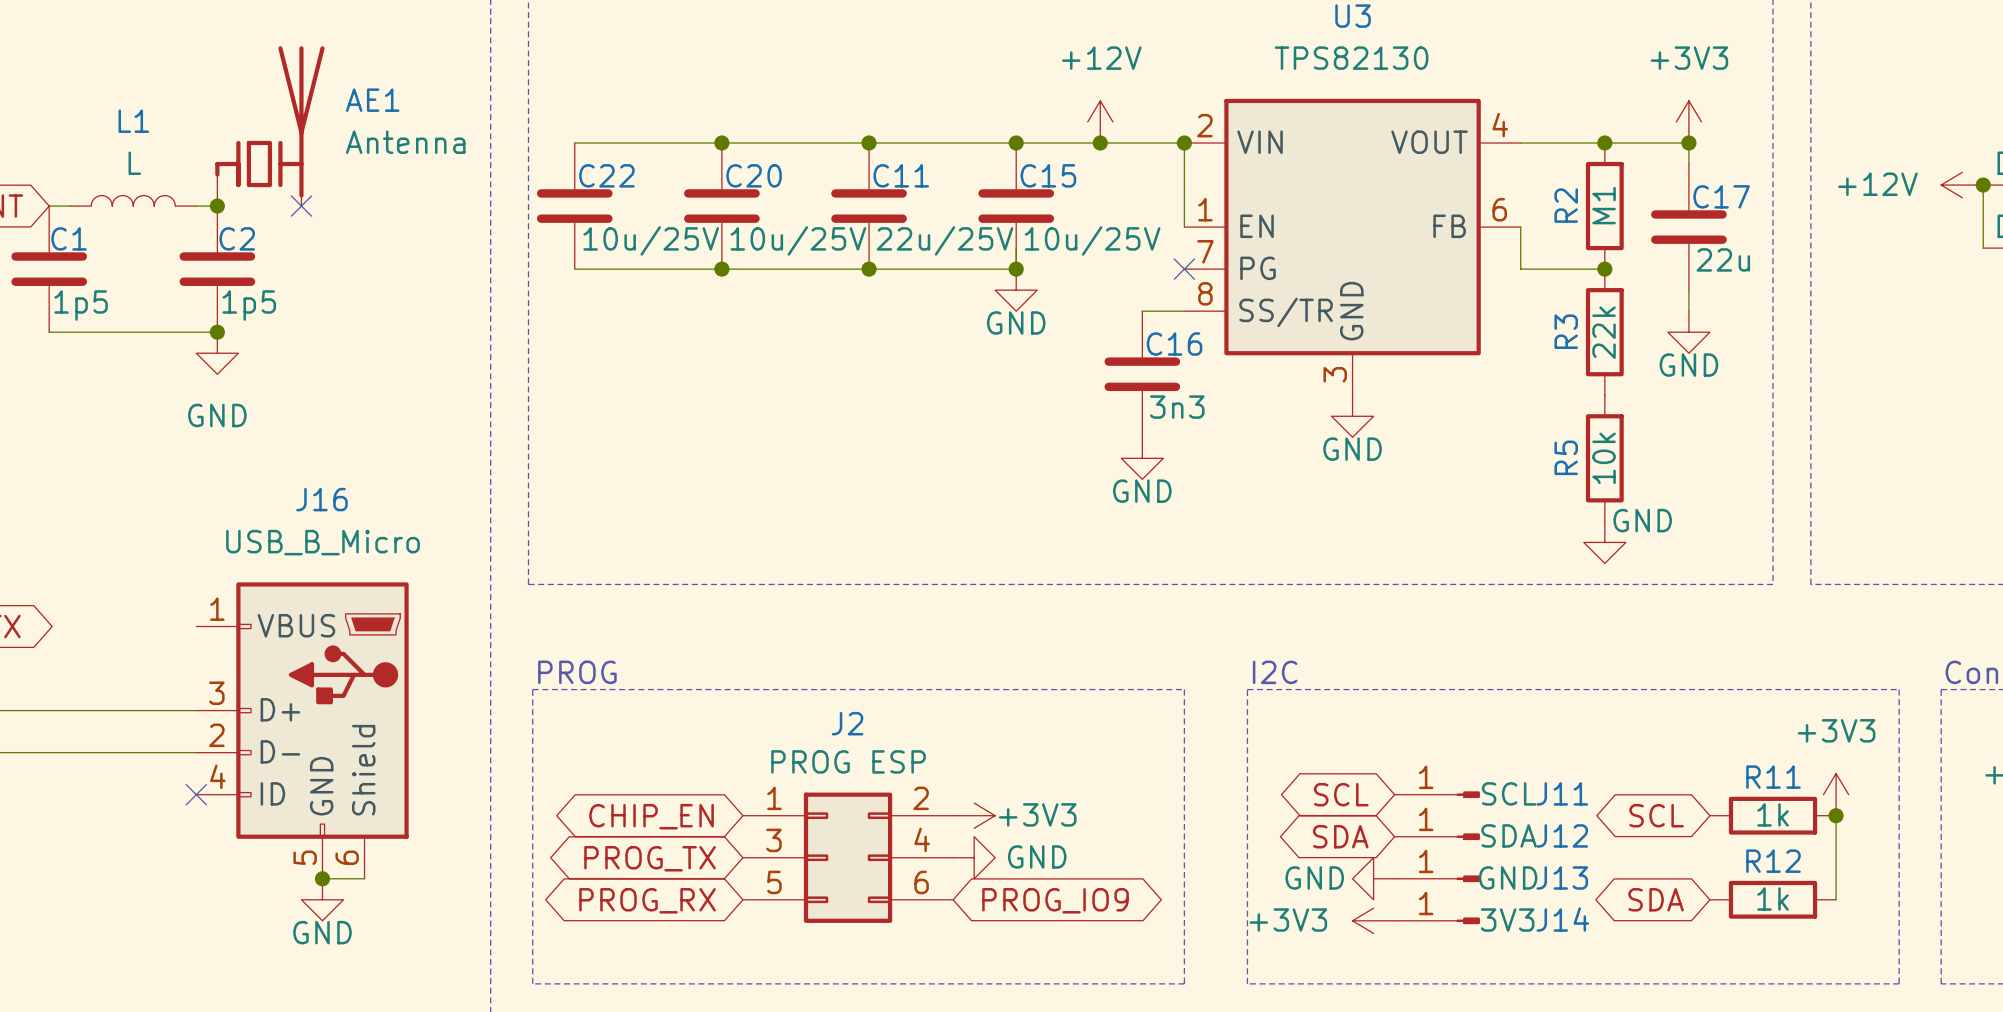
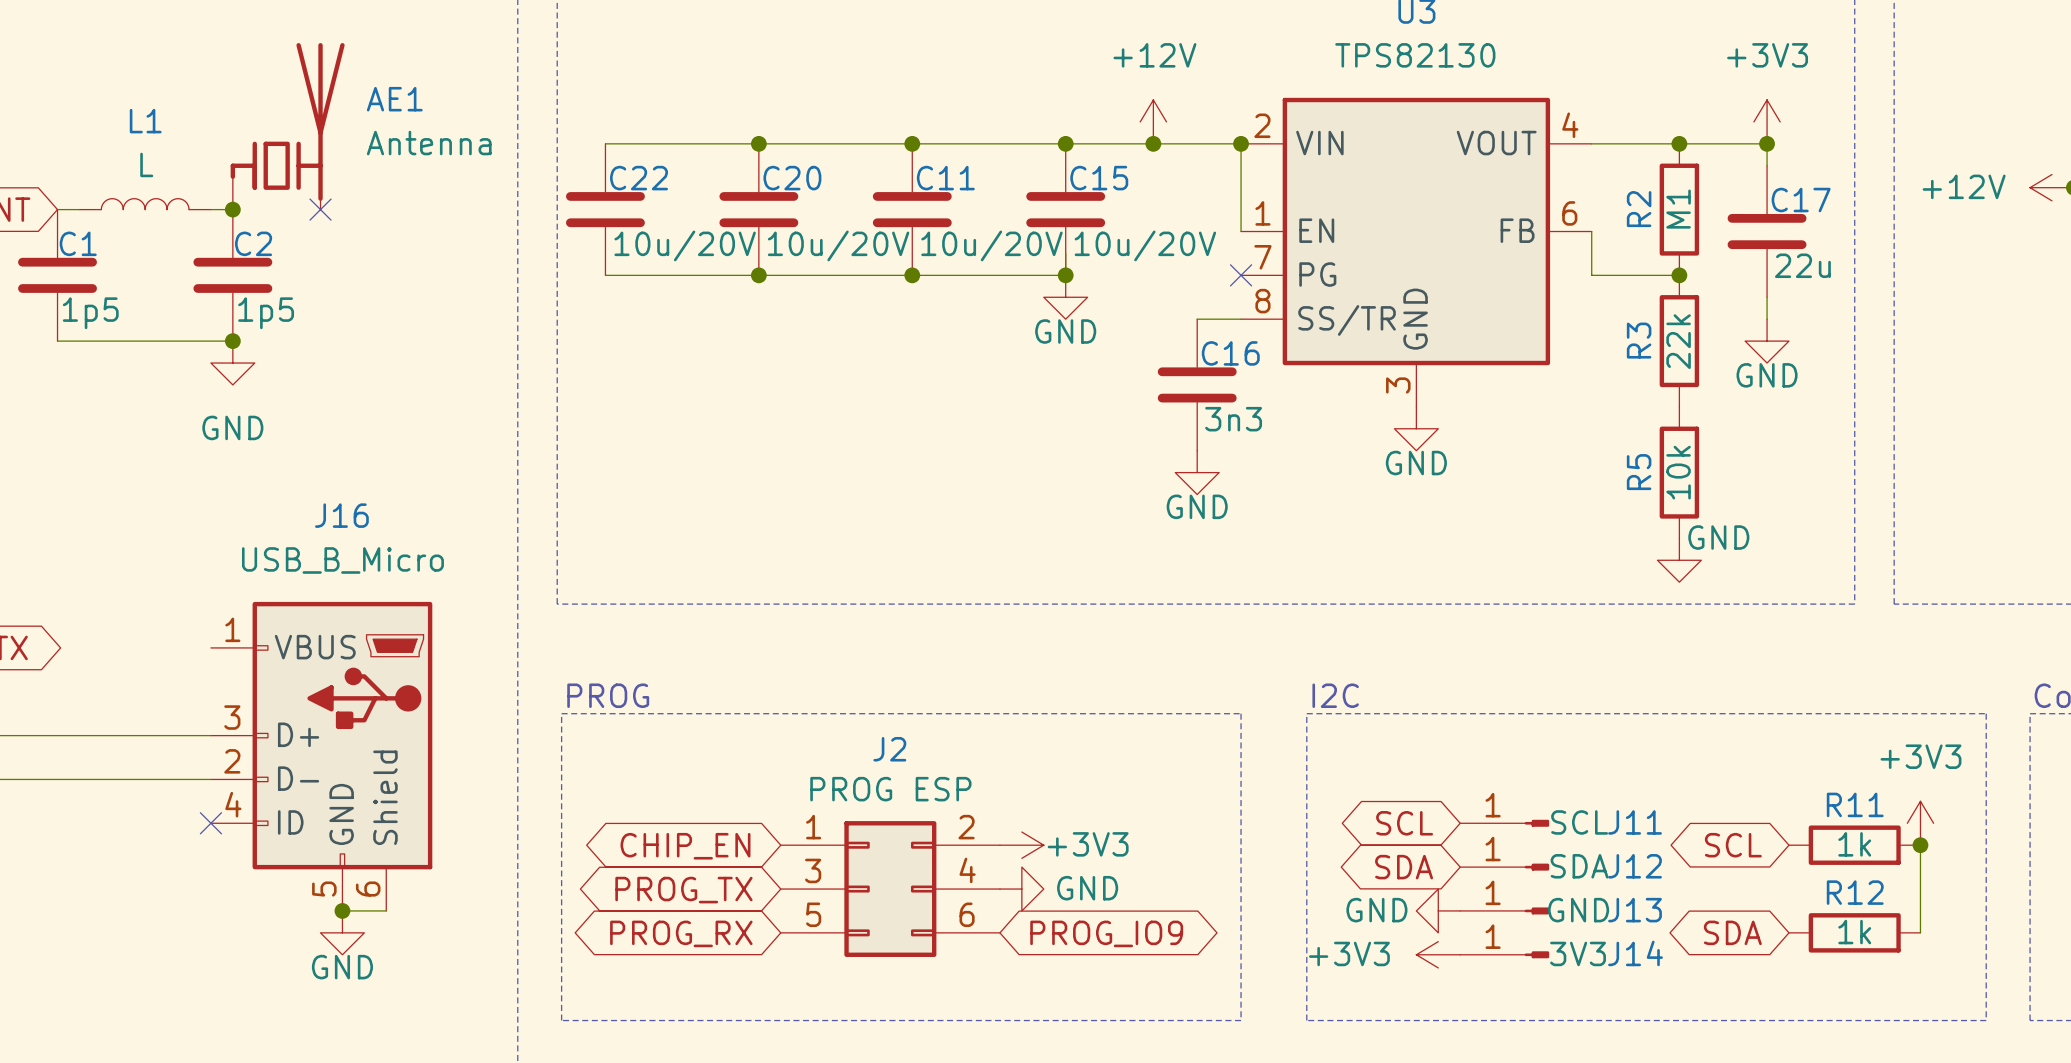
C22 value: 10u/25V (651, 240) -> 10u/20V (685, 245)
C20 value: 10u/25V (798, 240) -> 10u/20V (838, 245)
C11 value: 22u/25V (944, 240) -> 10u/20V (991, 245)
C15 value: 10u/25V (1092, 240) -> 10u/20V (1145, 245)

